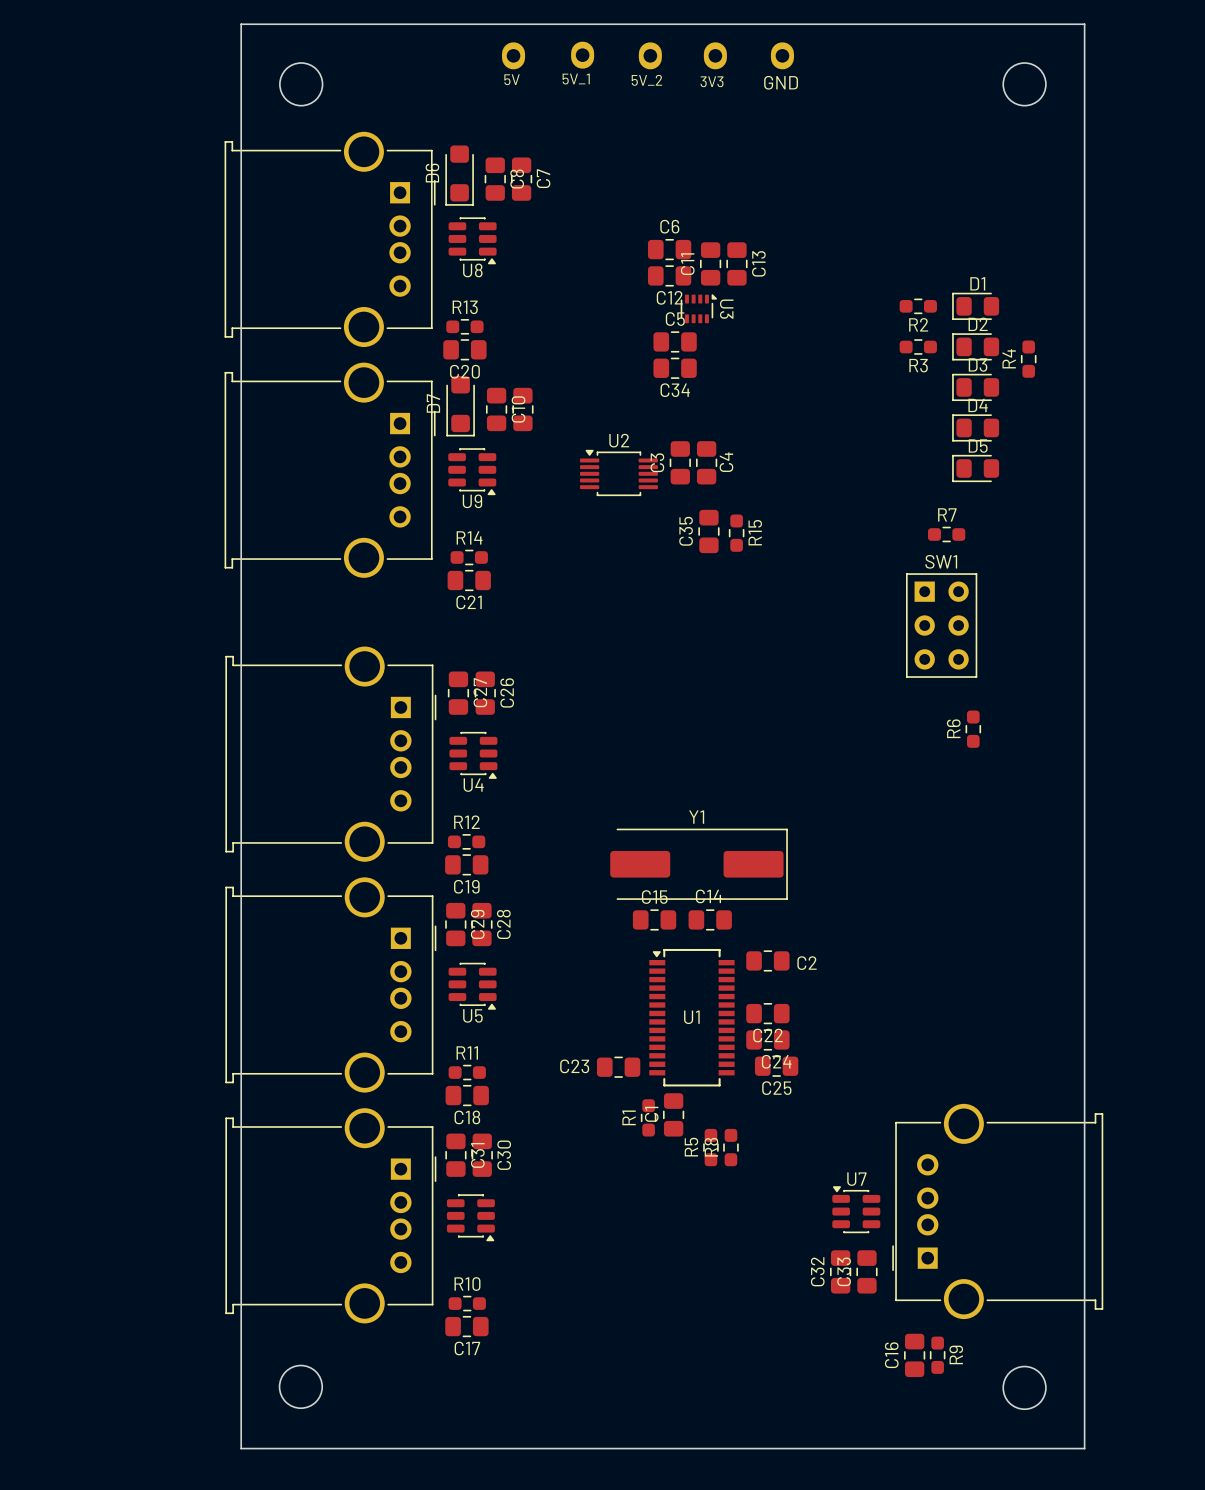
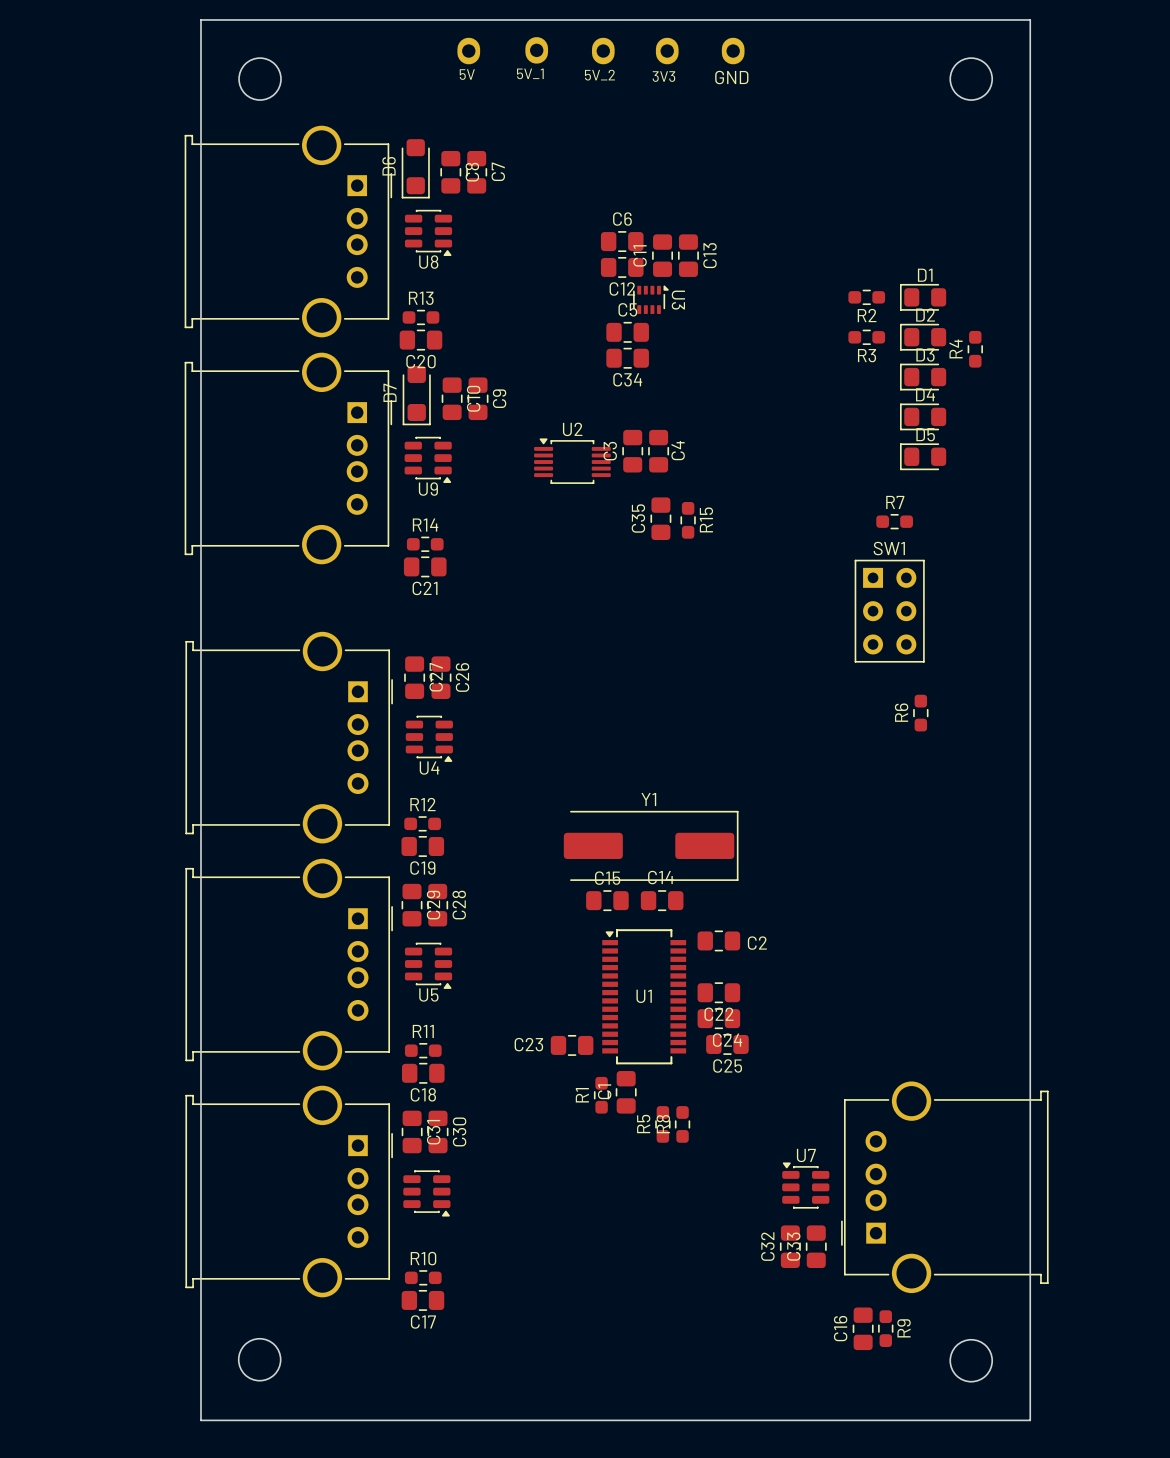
C9 name: none -> C9 (499, 398)

